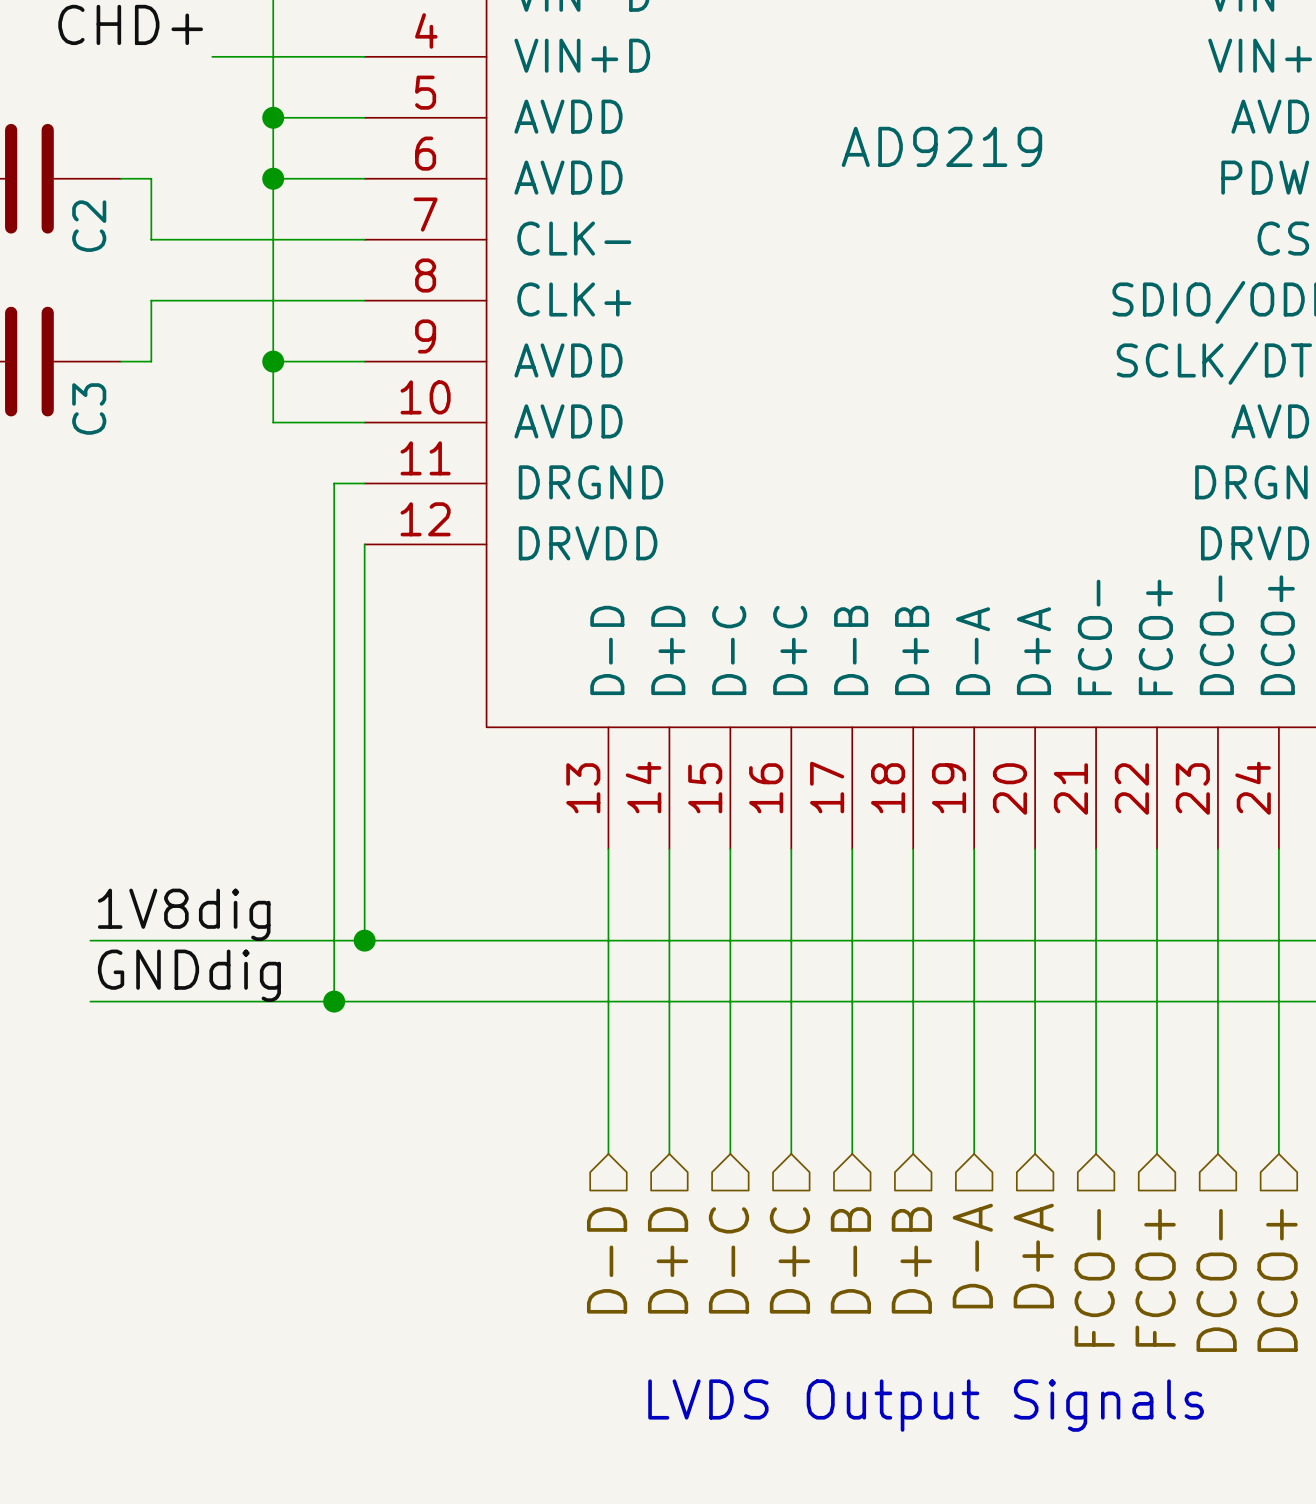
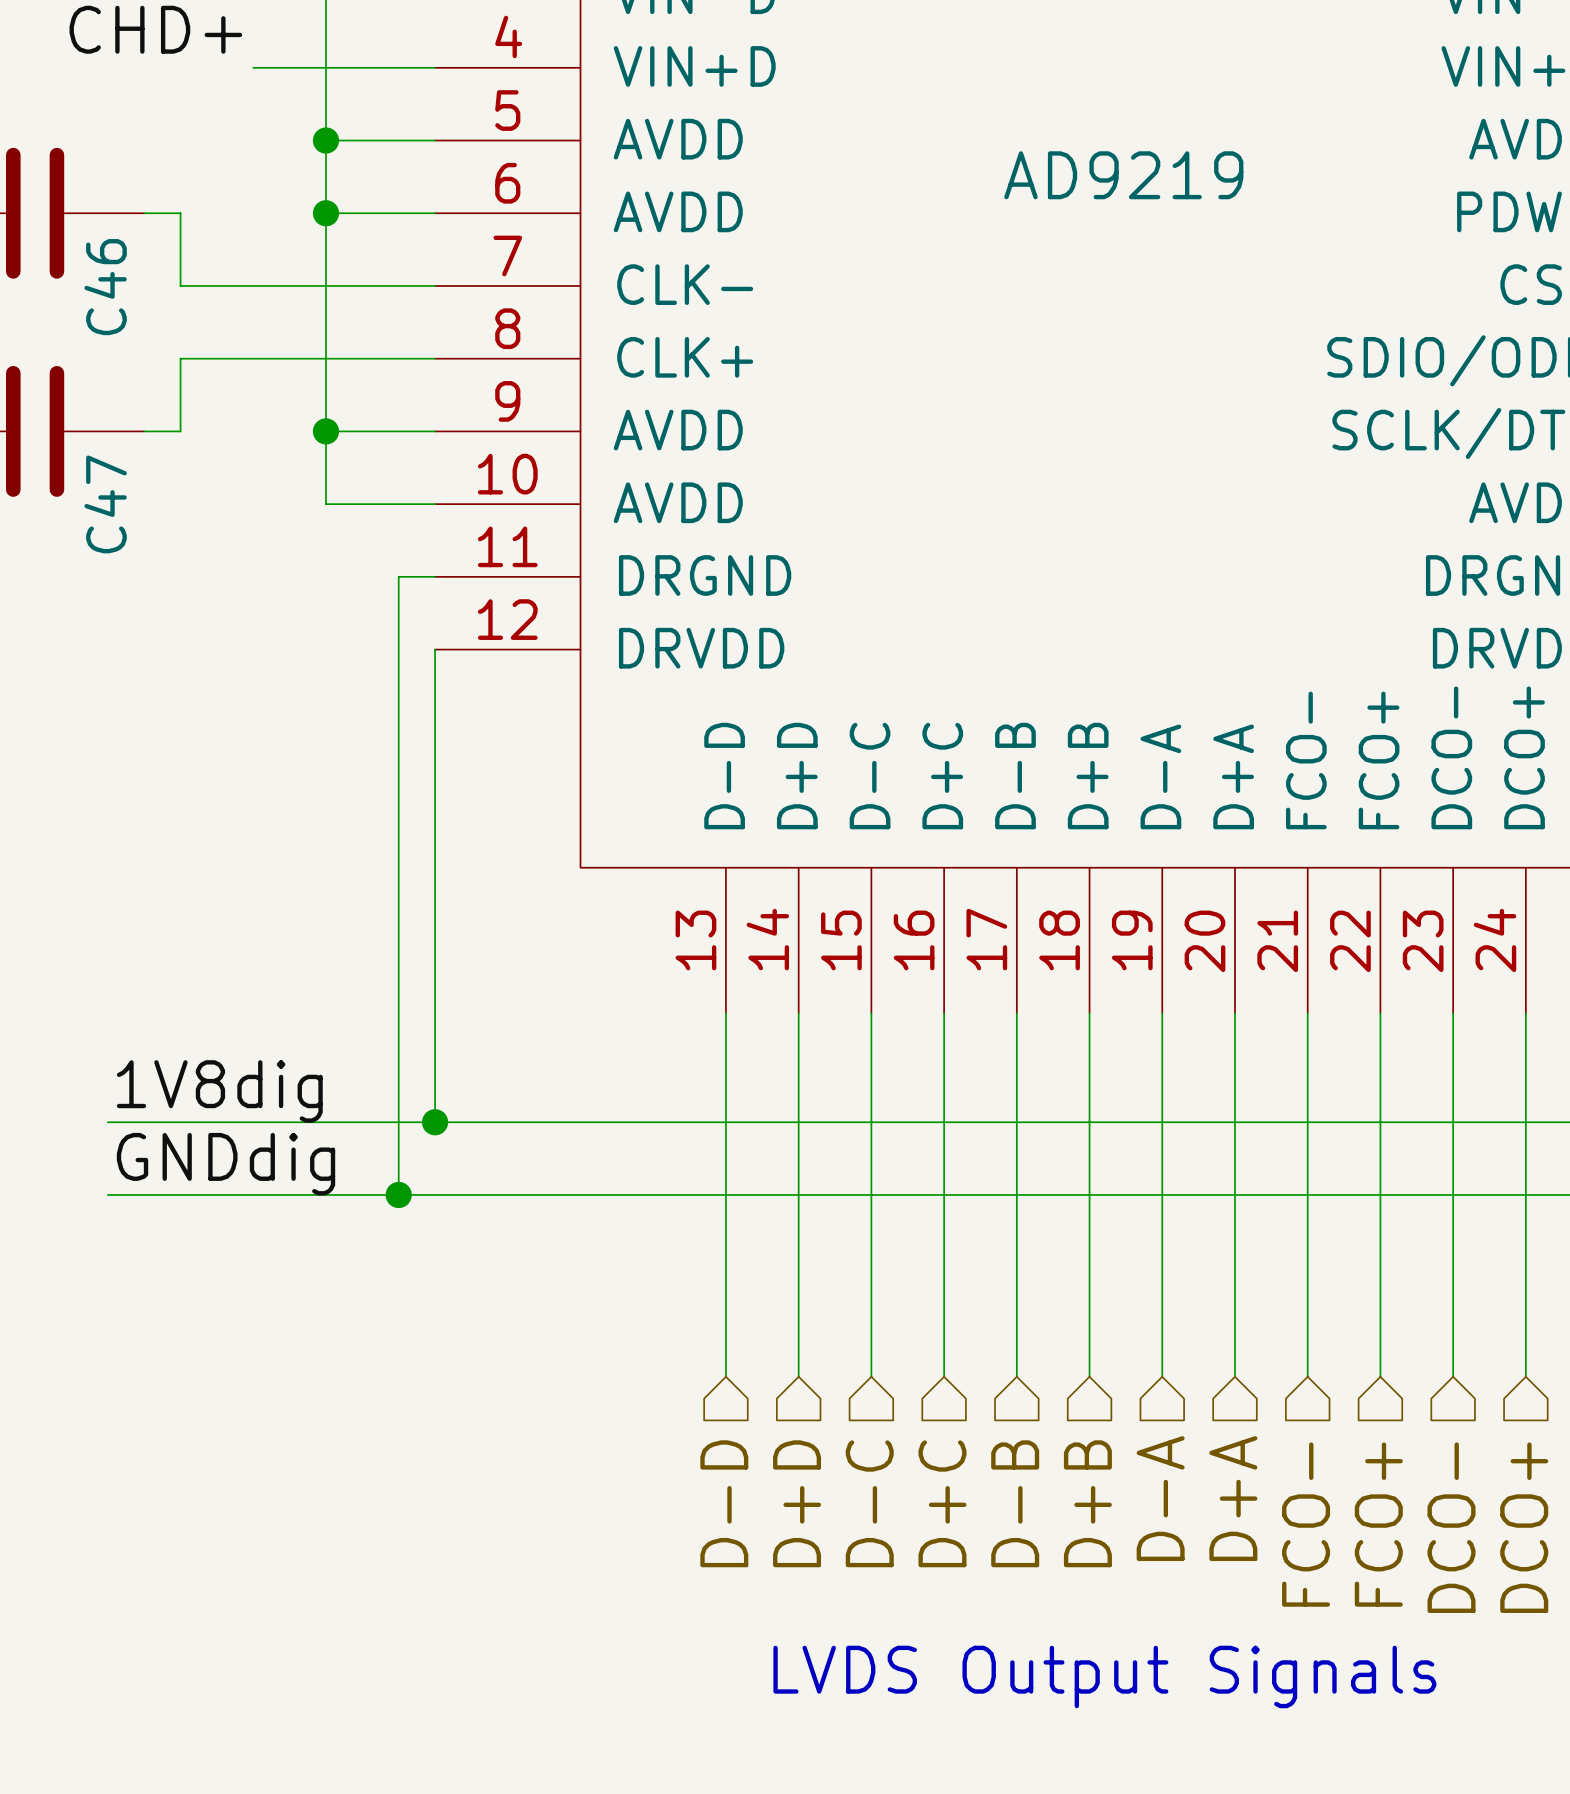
C2 name: C2 (89, 226) -> C46 (105, 287)
C3 name: C3 (89, 408) -> C47 (105, 504)

